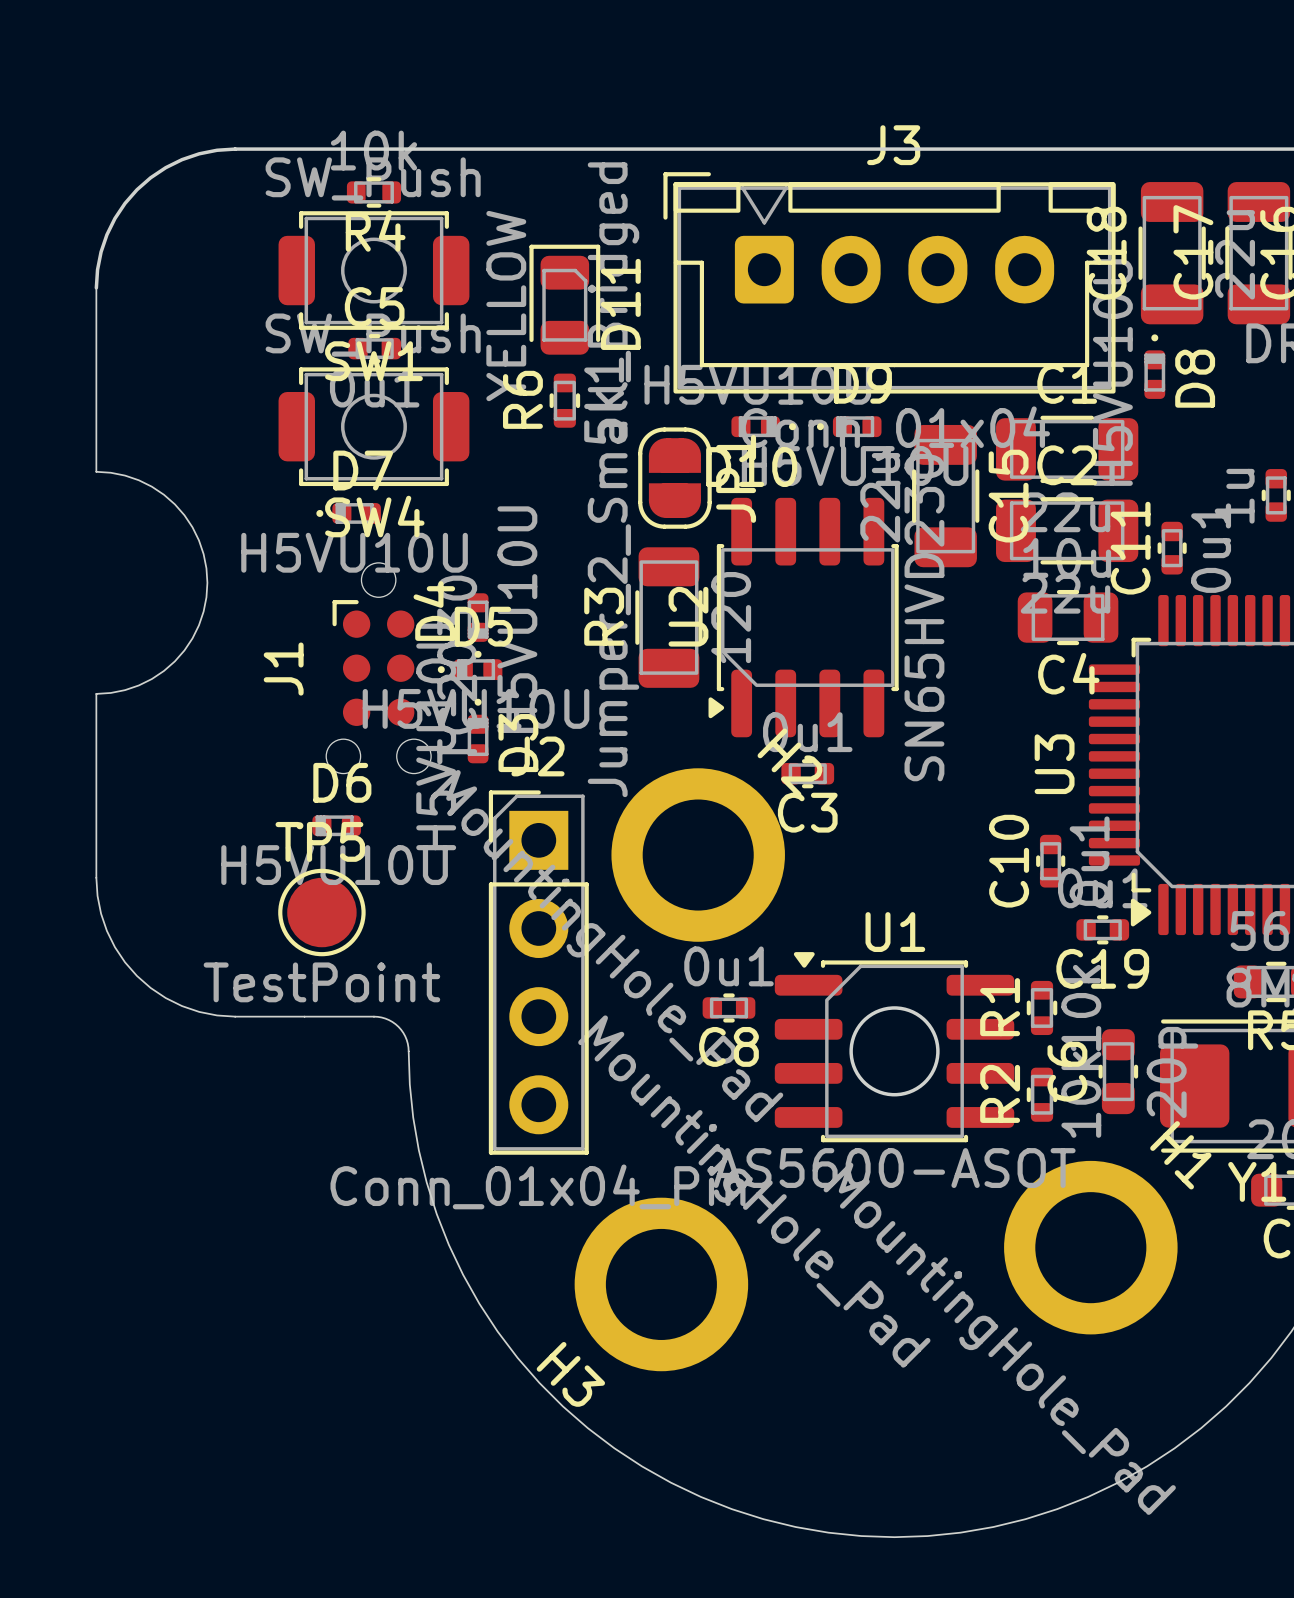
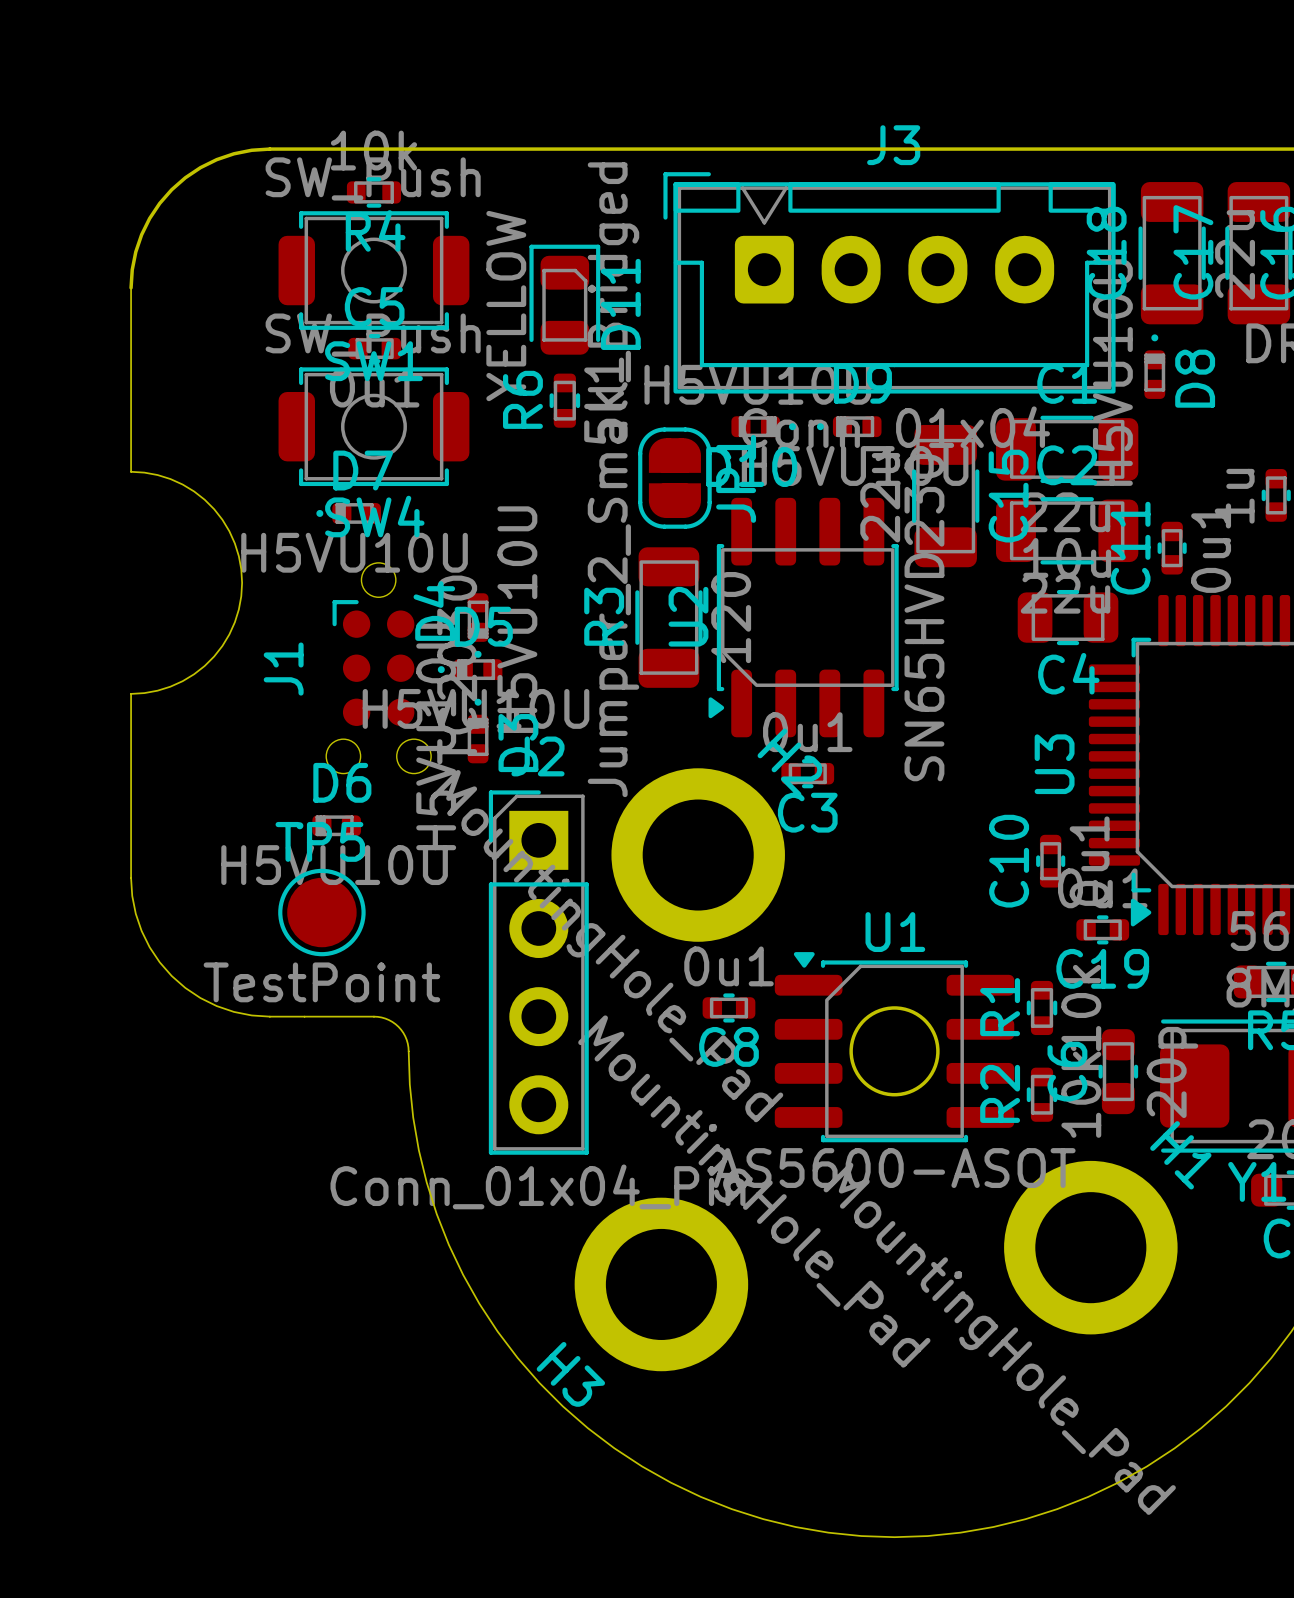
board edge: (269, 149) (217, 150) (199, 153) (165, 167) (150, 177) (137, 189) (114, 218) (101, 251) (96, 287) (96, 471) (125, 475) (138, 480) (151, 486) (174, 504) (192, 527) (198, 540) (203, 554) (207, 582) (203, 611) (198, 625) (192, 638) (174, 661) (151, 679) (138, 685) (110, 692) (96, 693) (96, 877) (101, 913) (114, 947) (125, 962) (150, 987) (165, 998) (199, 1011) (217, 1015) (269, 1016) -> (269, 149) (251, 150) (216, 159) (185, 177) (171, 189) (159, 203) (141, 234) (135, 251) (131, 287) (131, 471) (157, 475) (170, 479) (194, 491) (214, 509) (229, 531) (234, 543) (238, 556) (242, 582) (238, 609) (234, 622) (222, 645) (204, 665) (194, 674) (170, 686) (144, 693) (131, 693) (132, 895) (135, 913) (149, 947) (171, 975) (200, 998) (216, 1006) (233, 1011) (269, 1016)

